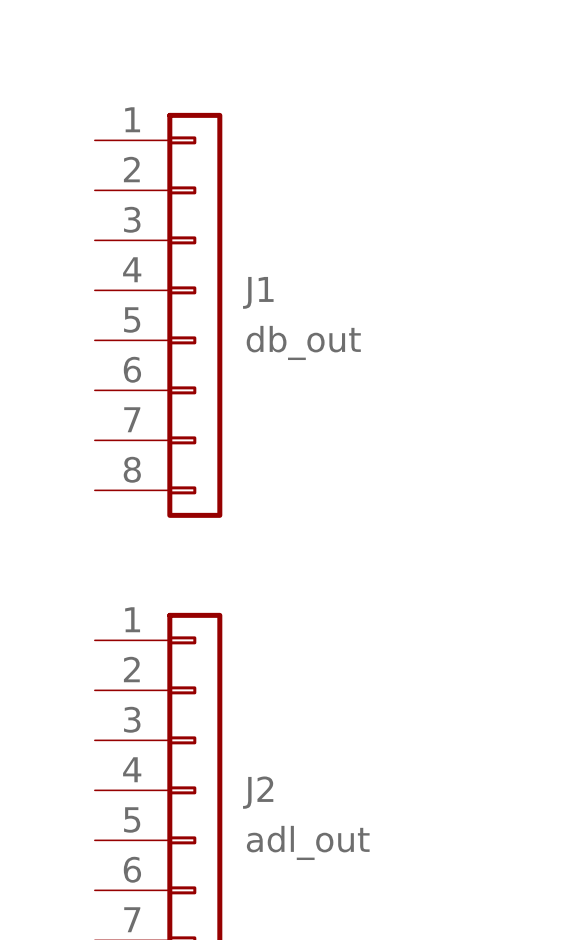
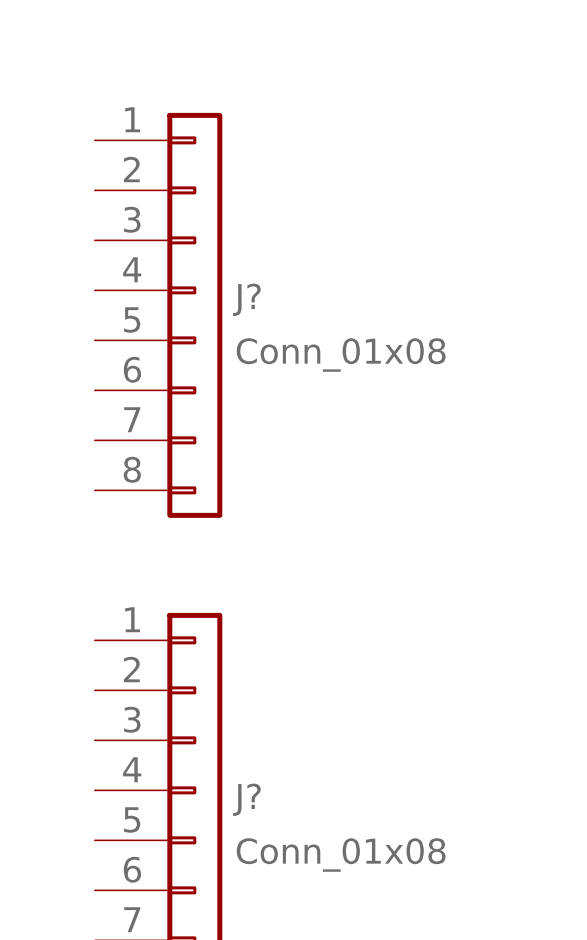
J1 name: J1 (258, 292) -> J? (246, 299)
J1 value: db_out (303, 342) -> Conn_01x08 (341, 355)
J2 name: J2 (258, 792) -> J? (246, 799)
J2 value: adl_out (308, 842) -> Conn_01x08 (341, 854)

